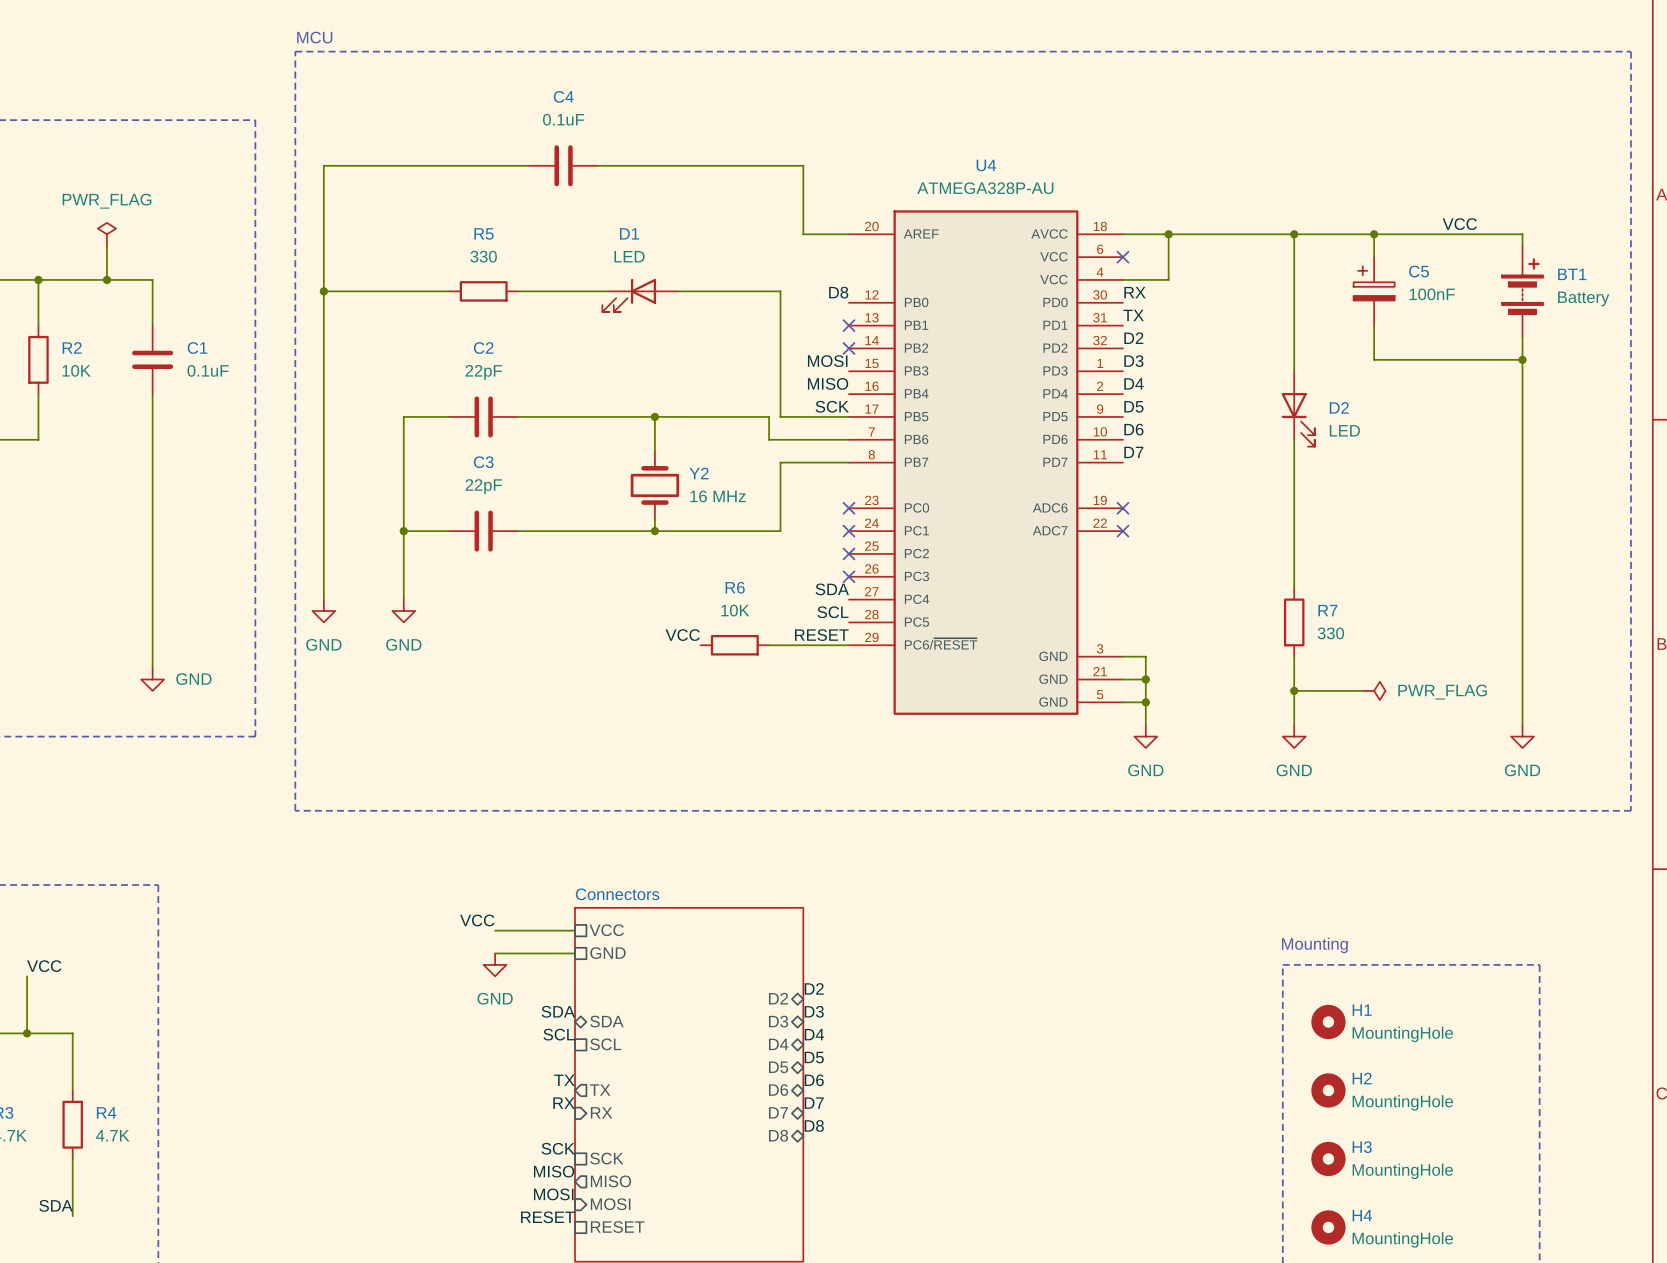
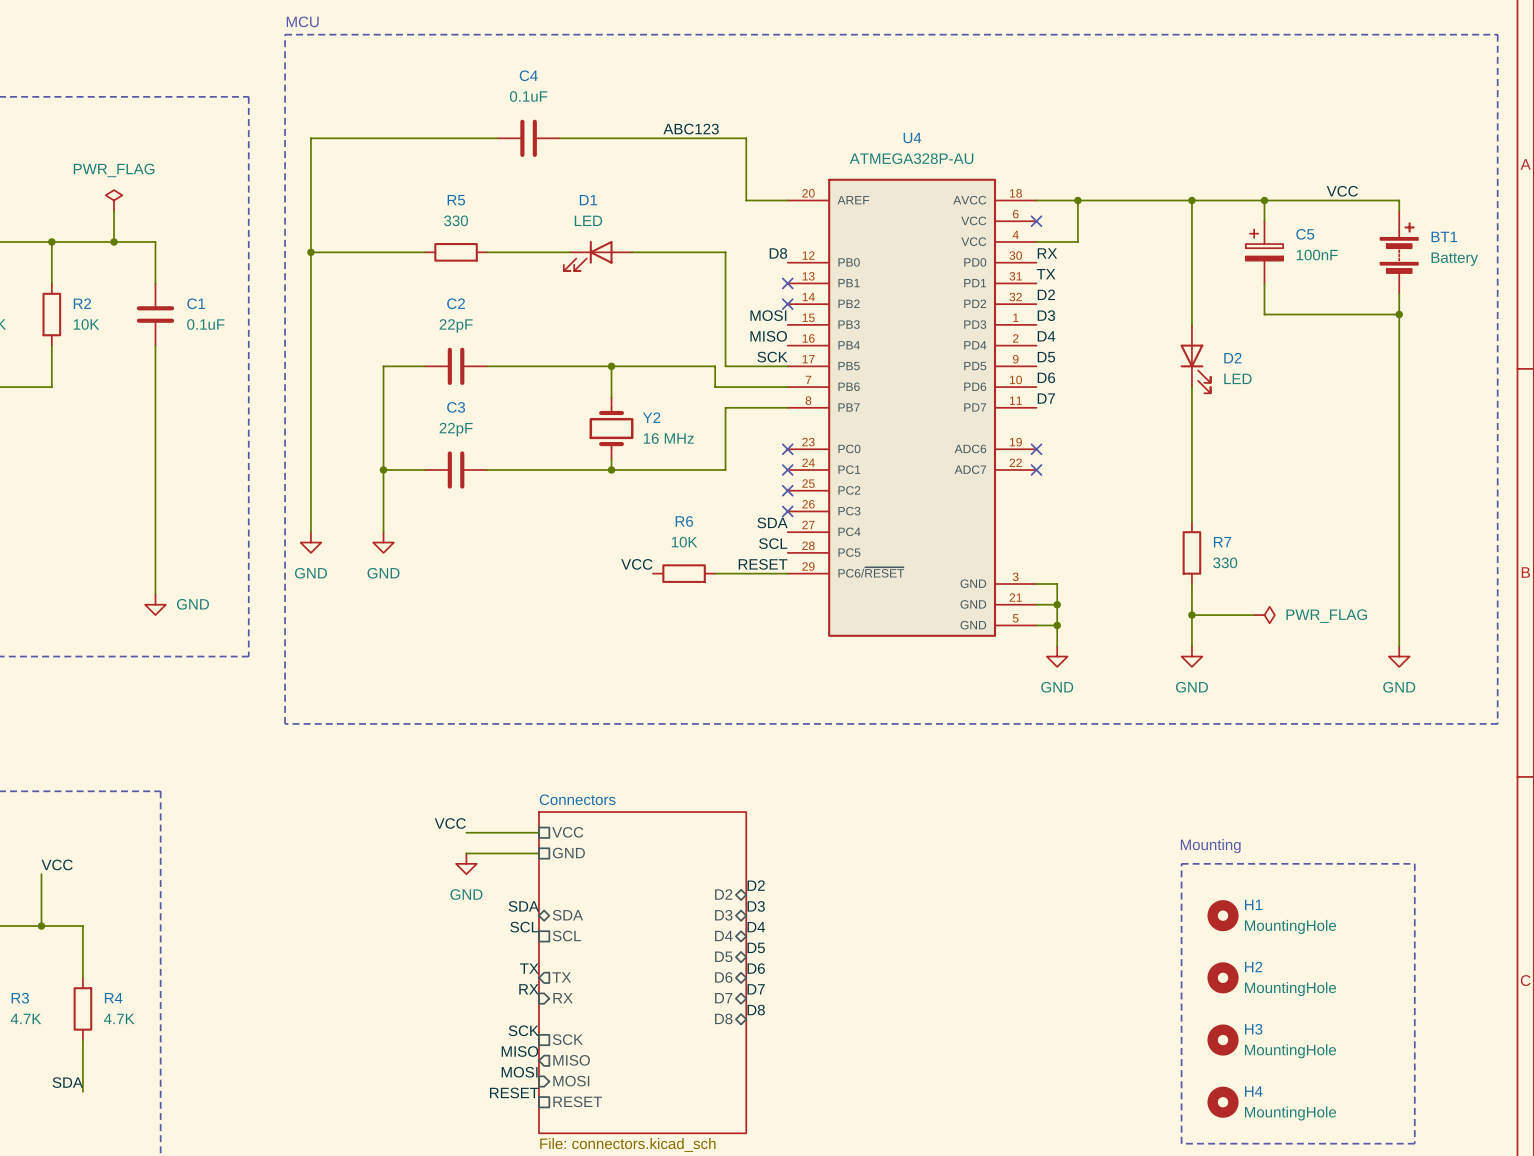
label: none -> ABC123 (691, 129)

